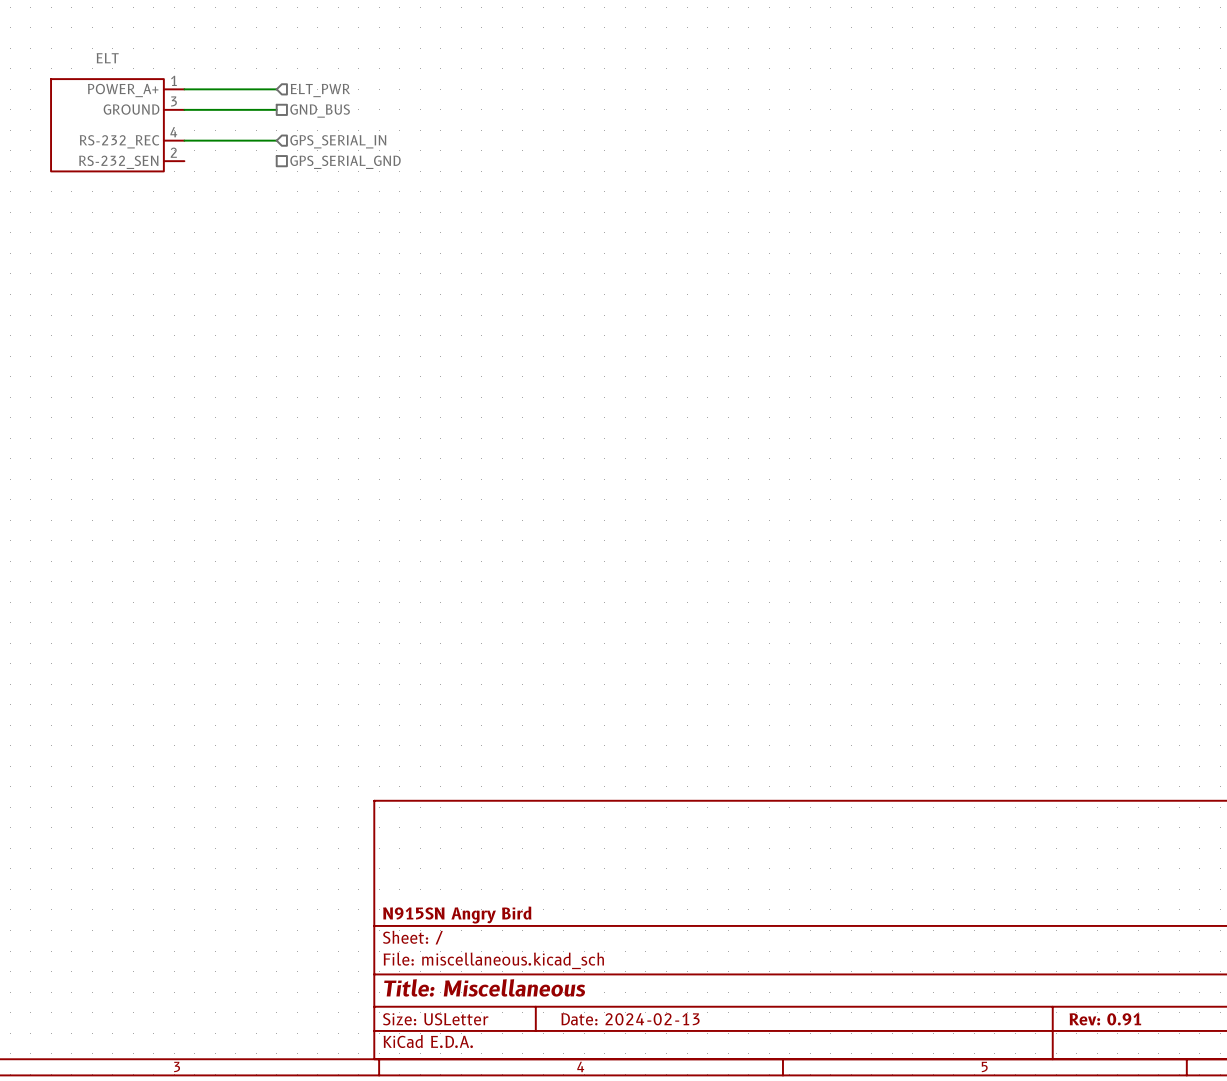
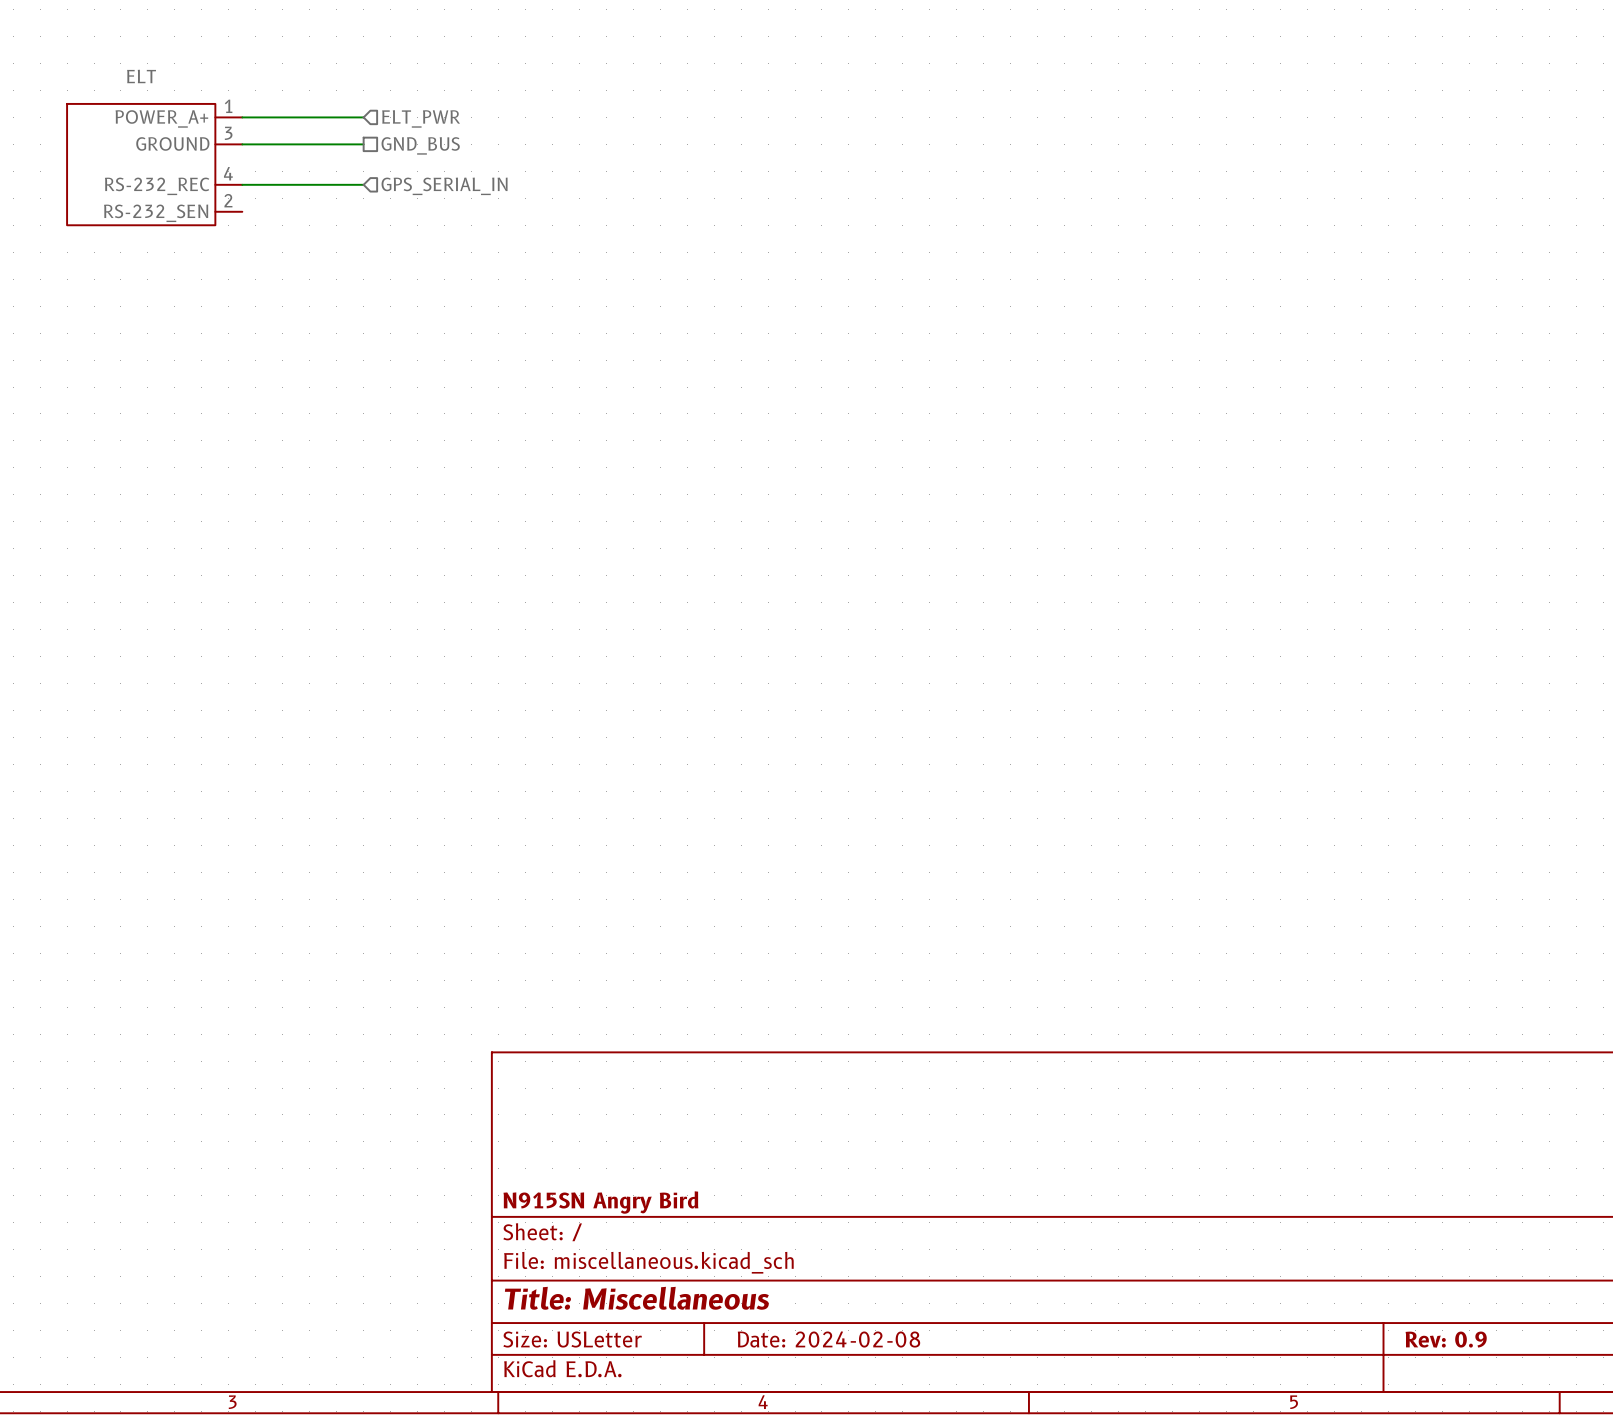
hierarchical label: GPS_SERIAL_GND (345, 162) -> none
title block: Date: 2024-02-13 (630, 1019) -> Date: 2024-02-08 (828, 1339)
title block: Rev: 0.91 (1105, 1019) -> Rev: 0.9 (1446, 1339)

